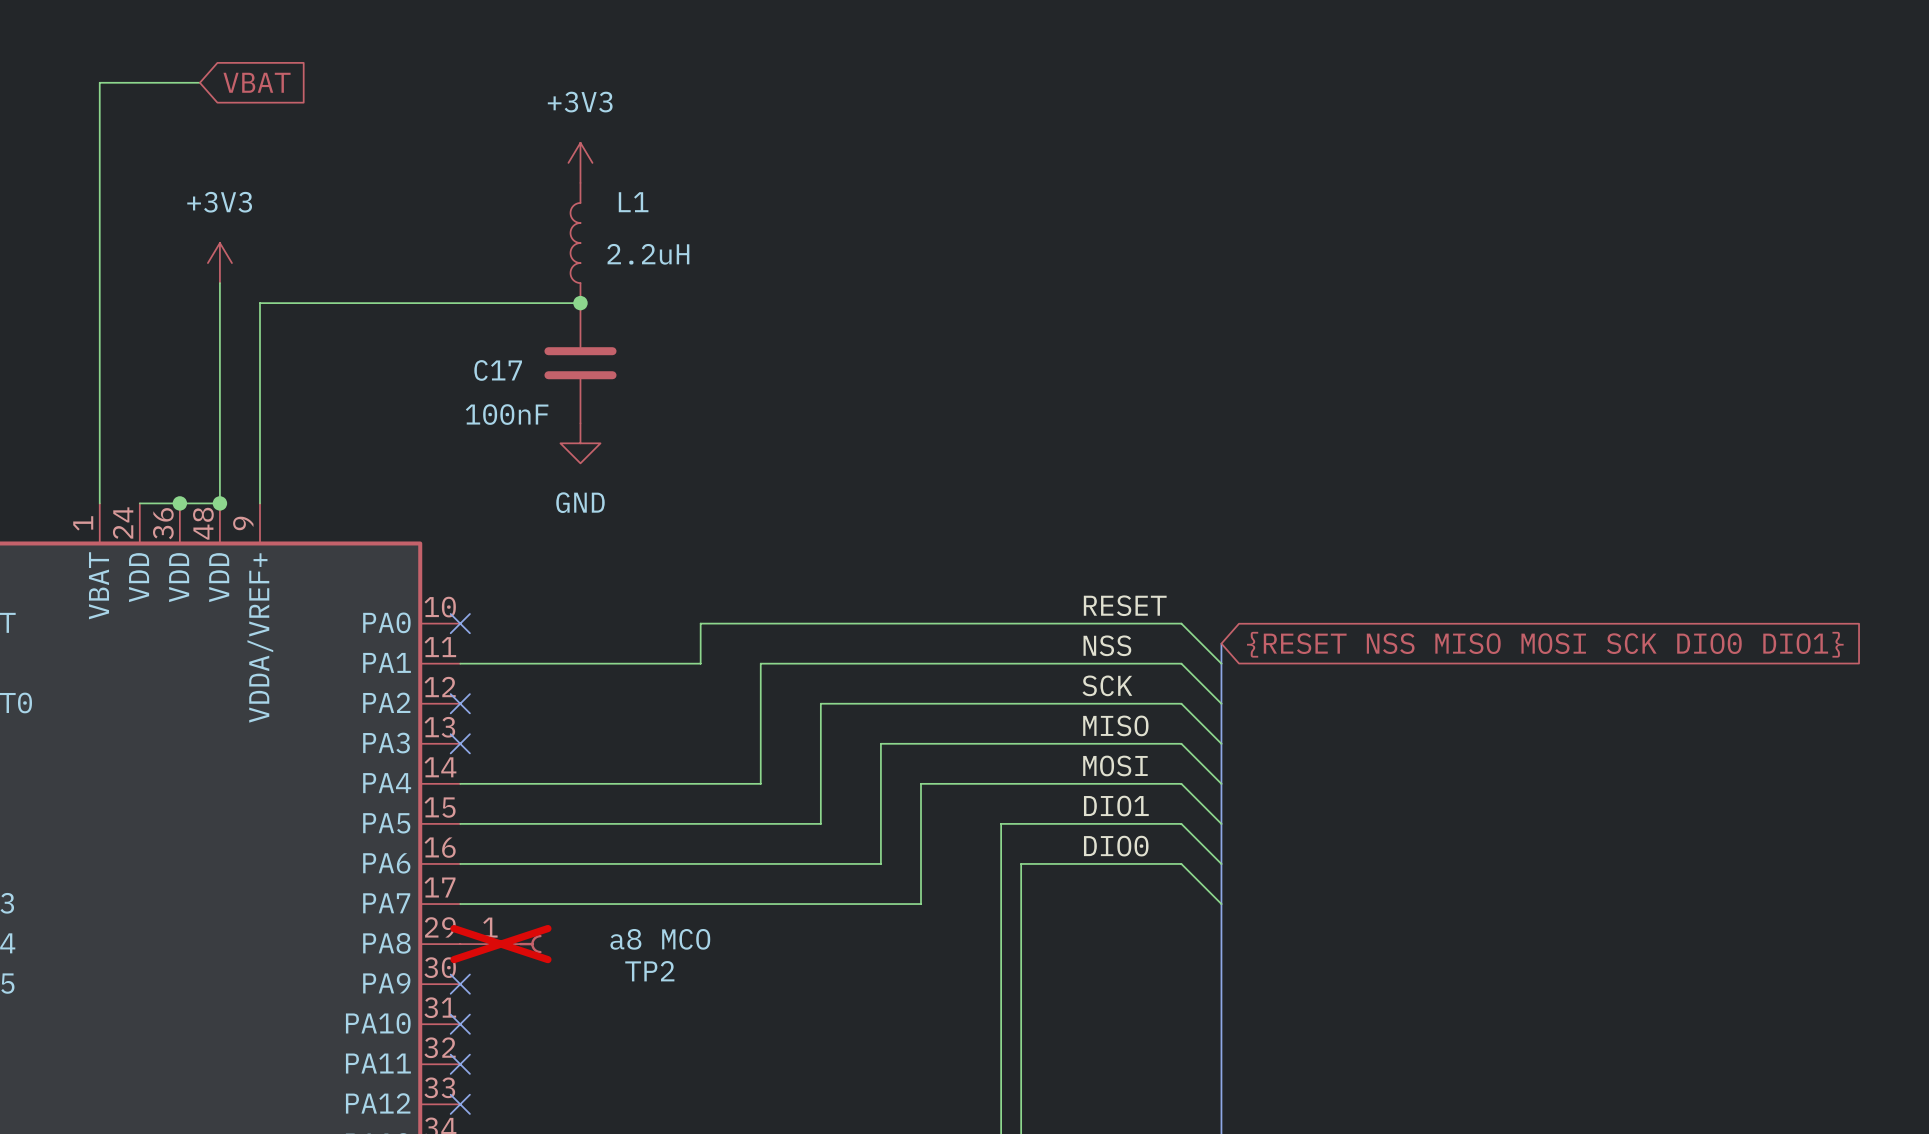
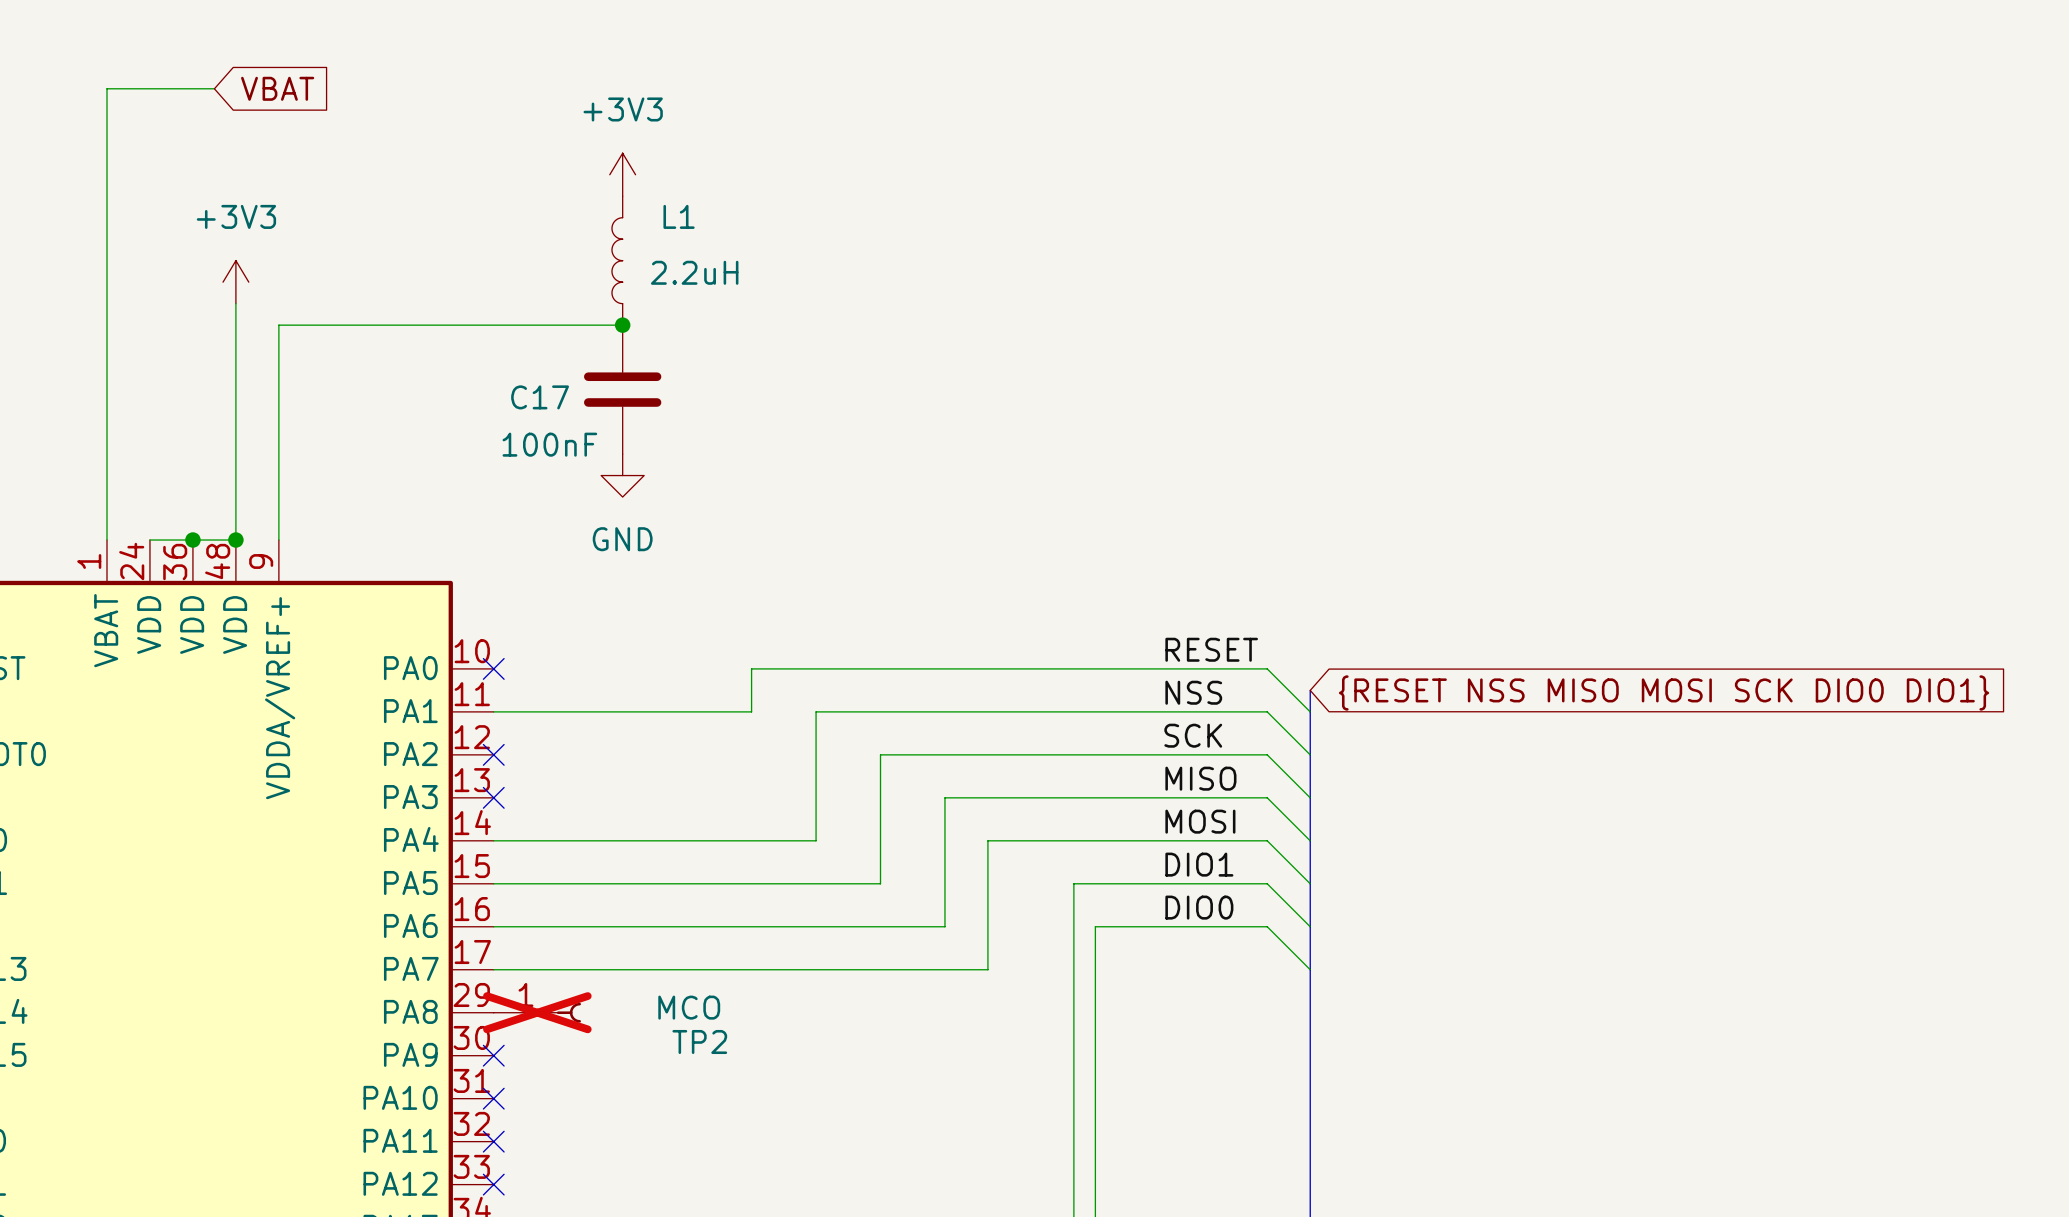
TP2 value: a8 MCO (660, 939) -> MCO (689, 1007)

